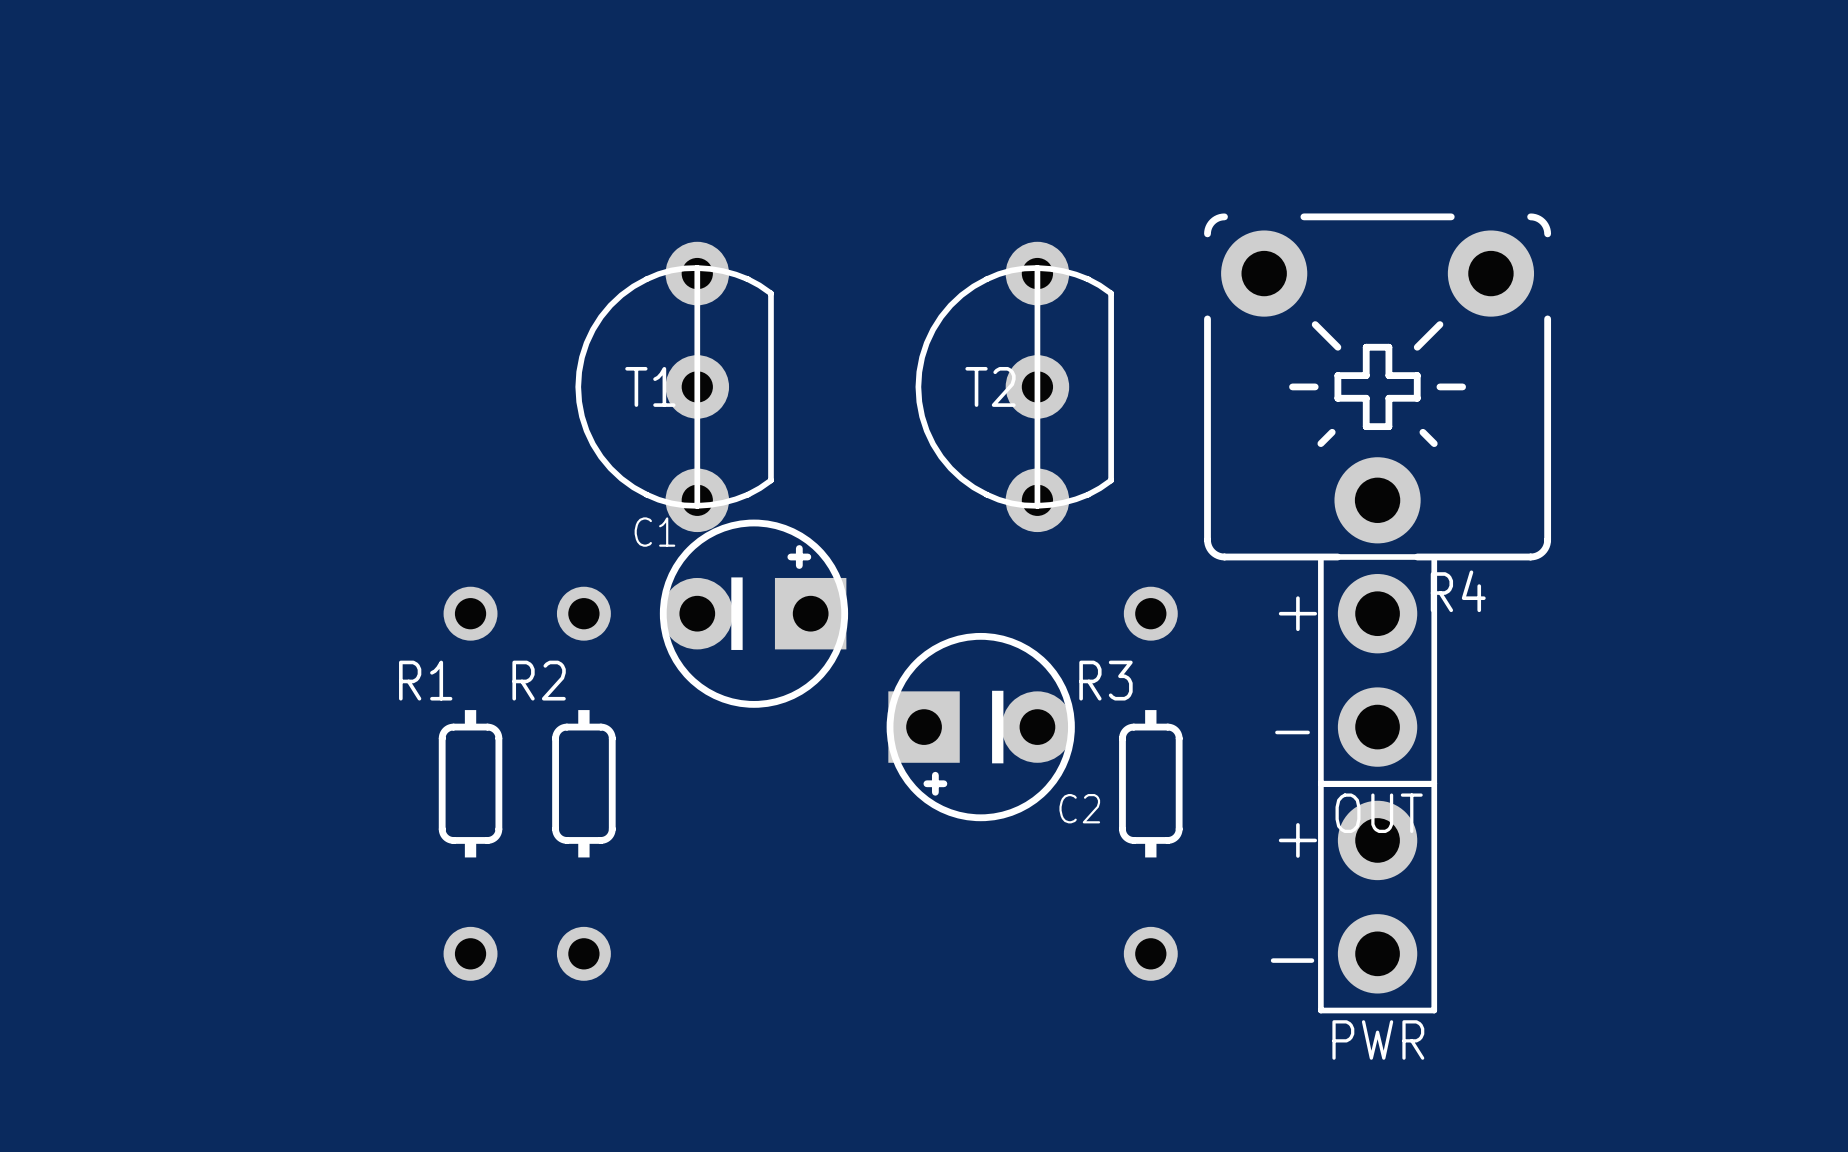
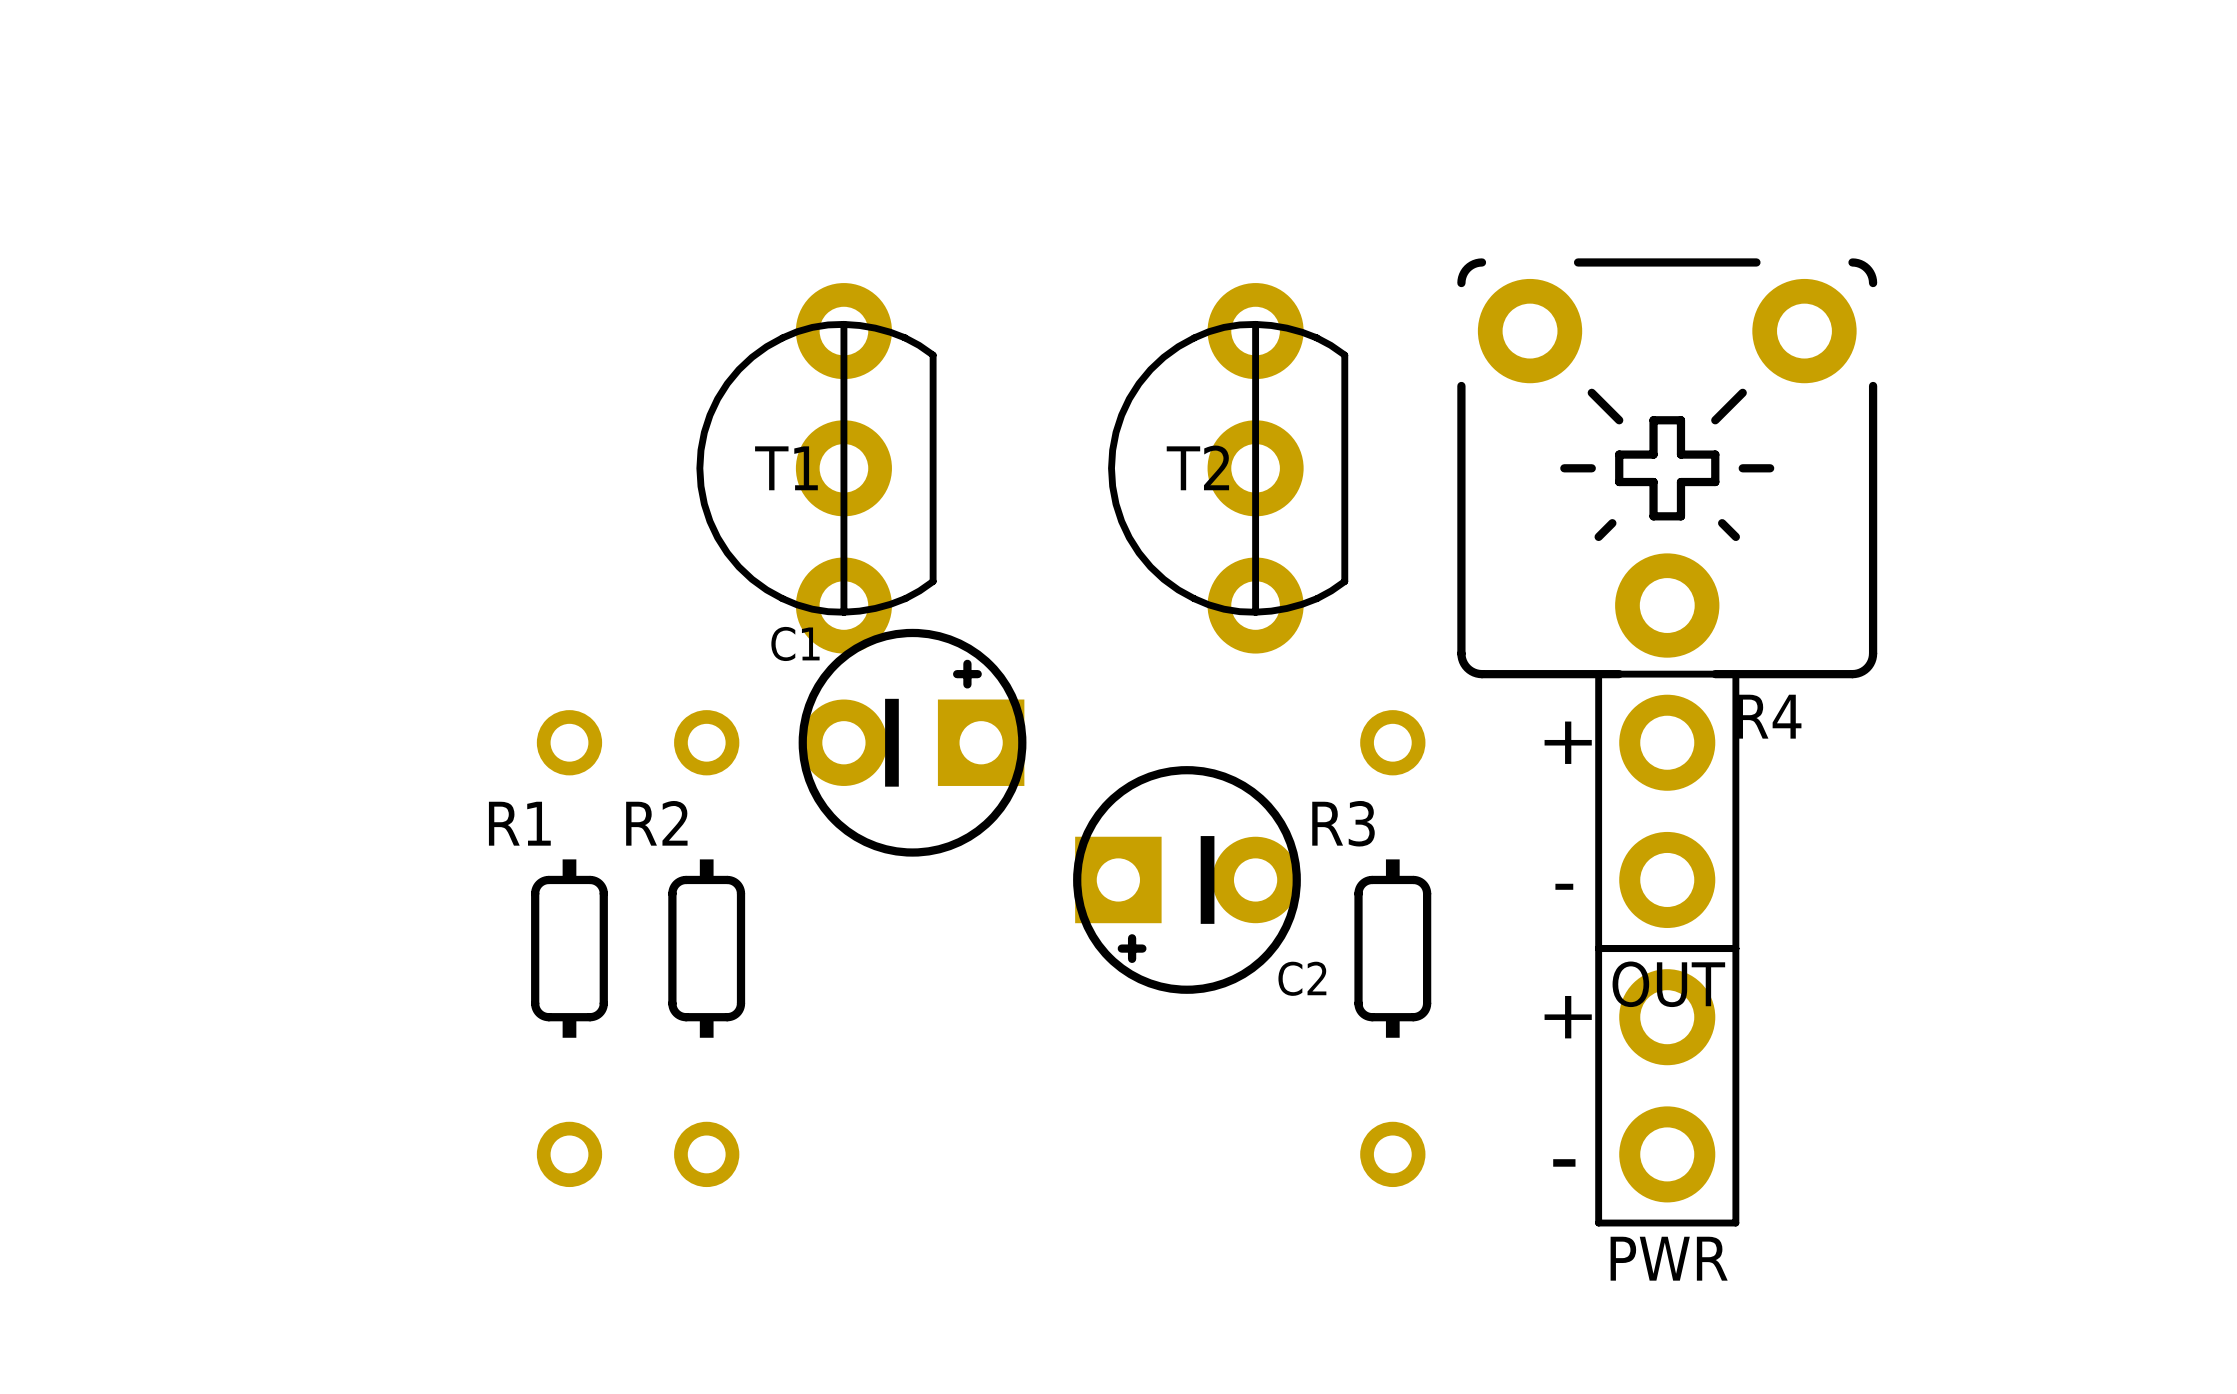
T1 footprint: [575, 241, 774, 533] -> [696, 283, 937, 654]
T2 footprint: [915, 241, 1114, 533] -> [1108, 283, 1349, 654]

